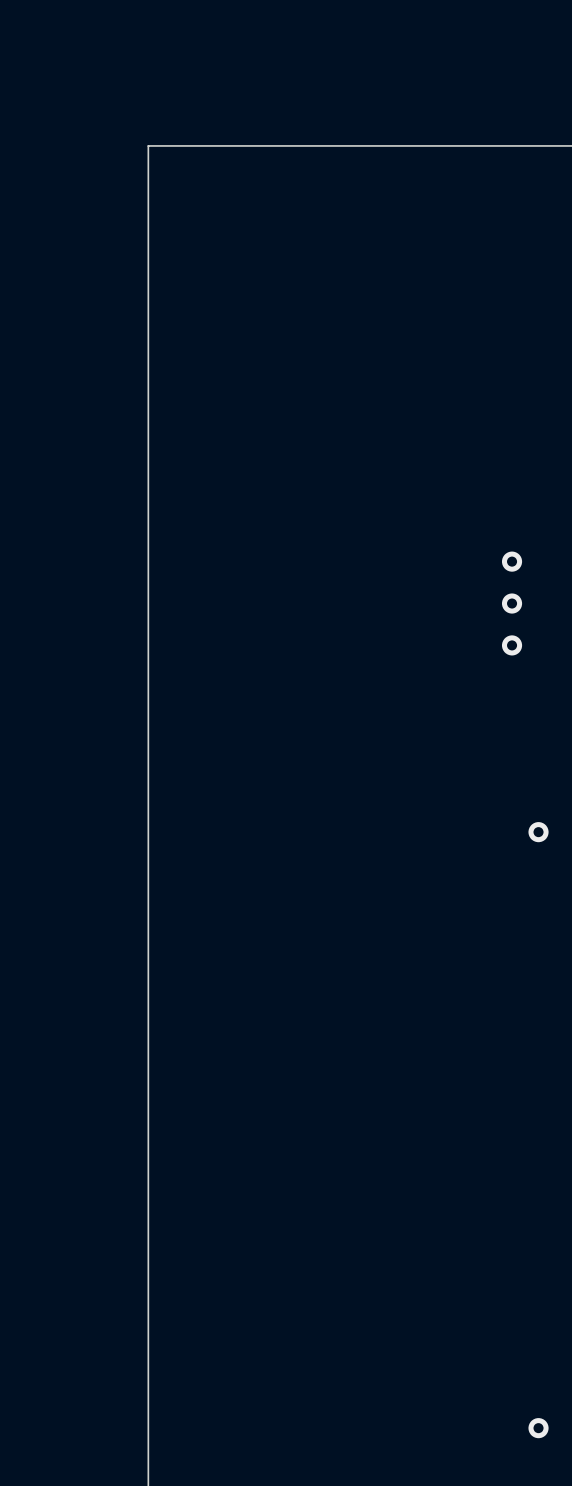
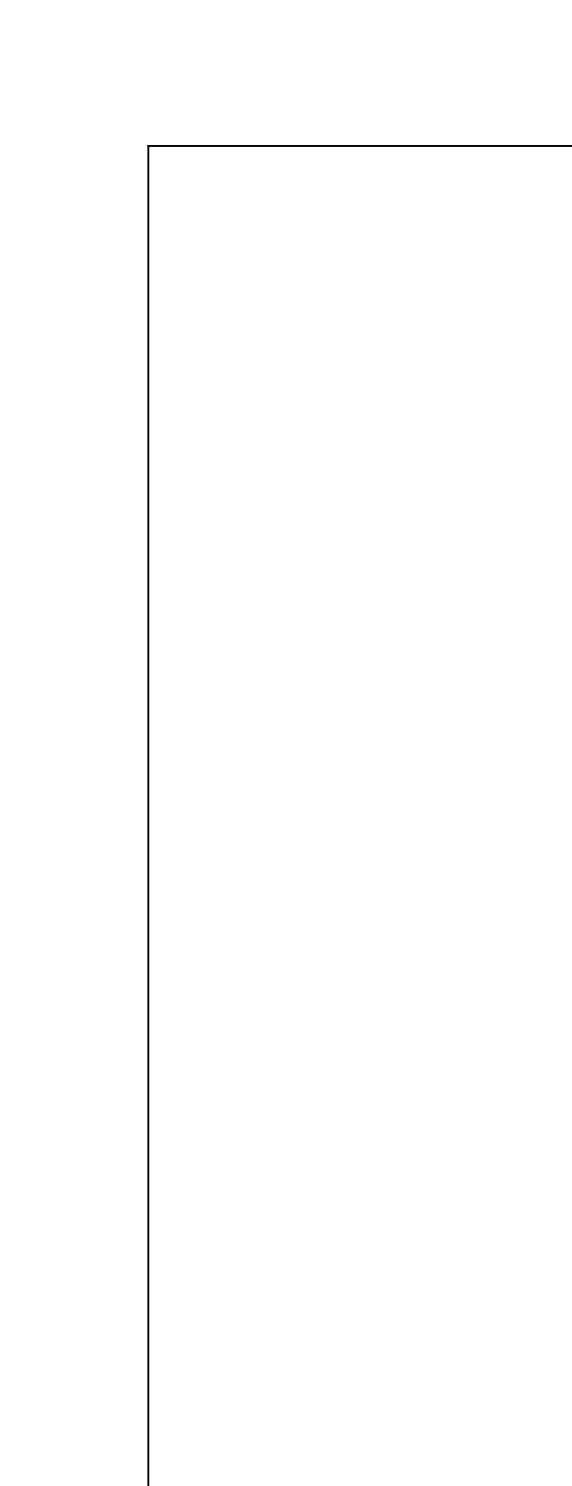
via: (512, 561) -> none
via: (512, 603) -> none
via: (512, 645) -> none
via: (538, 832) -> none
via: (538, 1428) -> none

